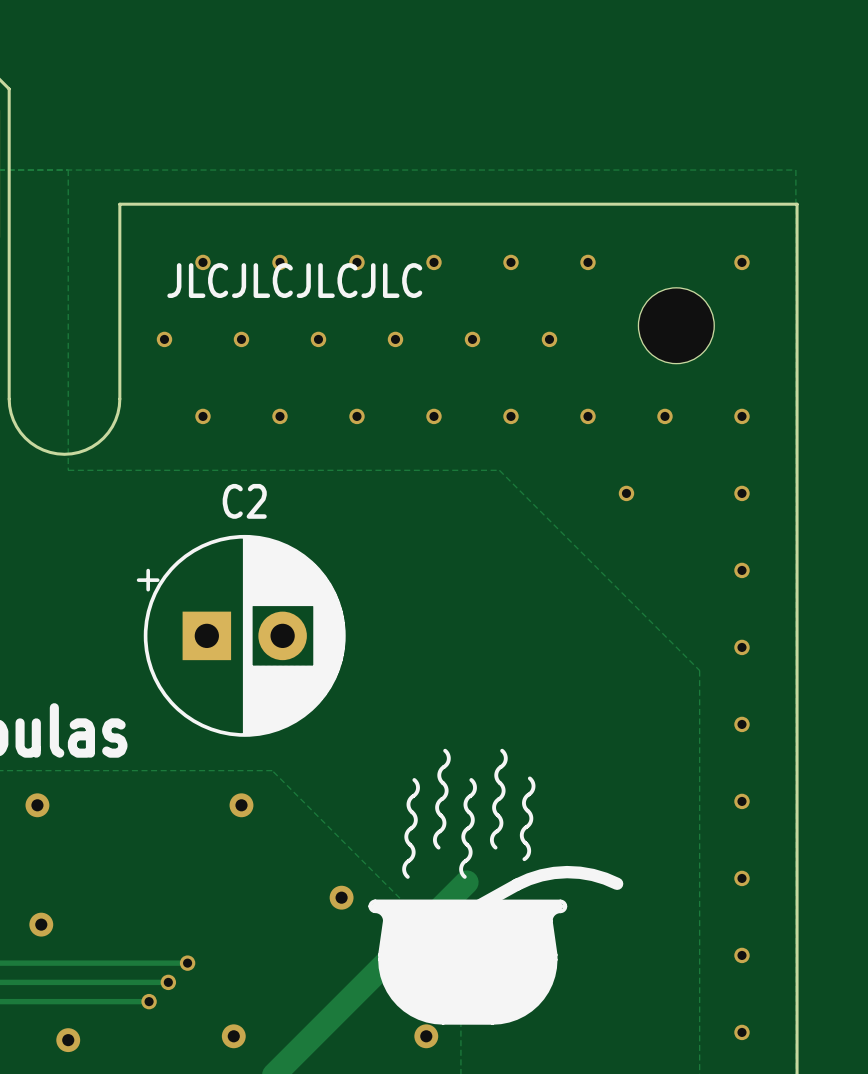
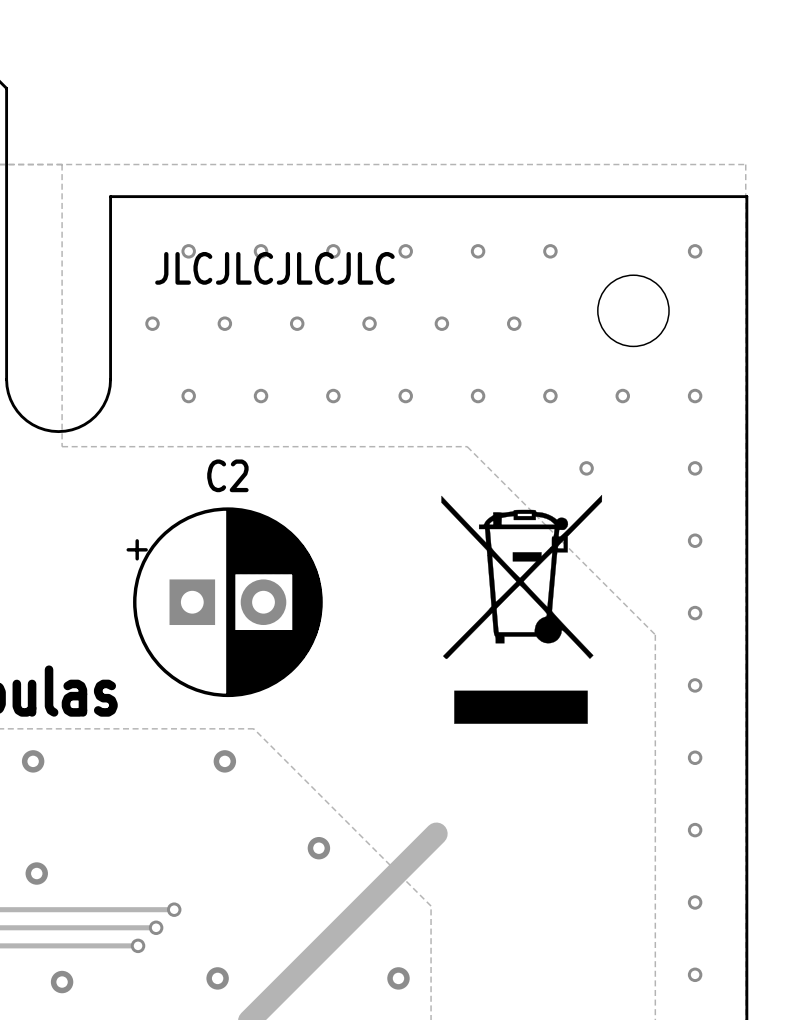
drawing: none -> [441, 494, 603, 724]
drawing: [368, 748, 624, 1025] -> none

